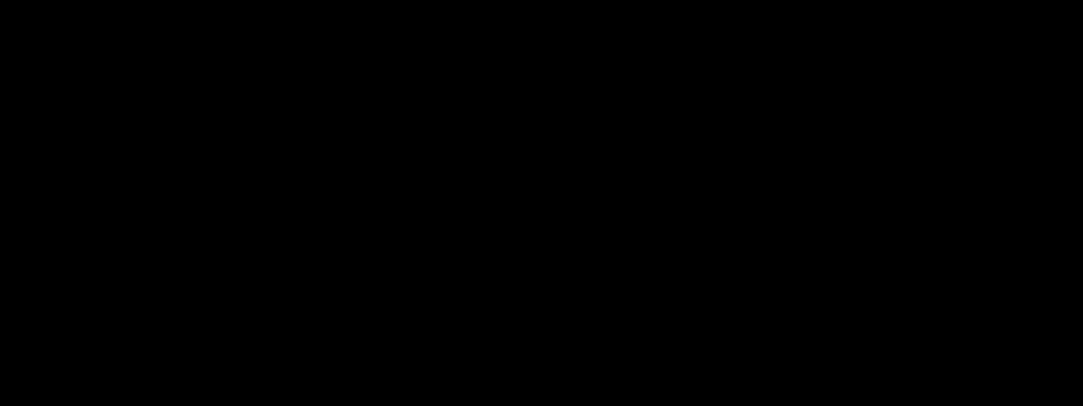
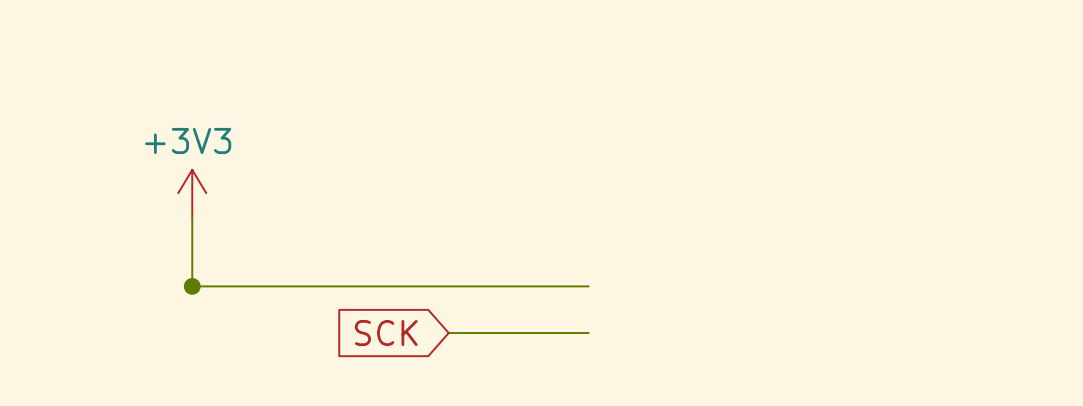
power symbol: none -> +3V3 (192, 193)
wire: none -> (192, 216) (192, 286) (588, 286)
junction: none -> (192, 286)
global label: none -> SCK (386, 333)
wire: none -> (448, 333) (588, 333)

